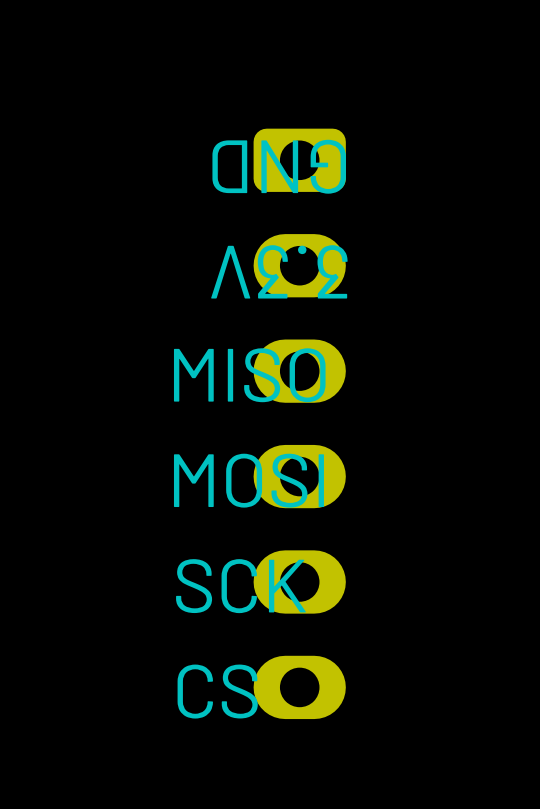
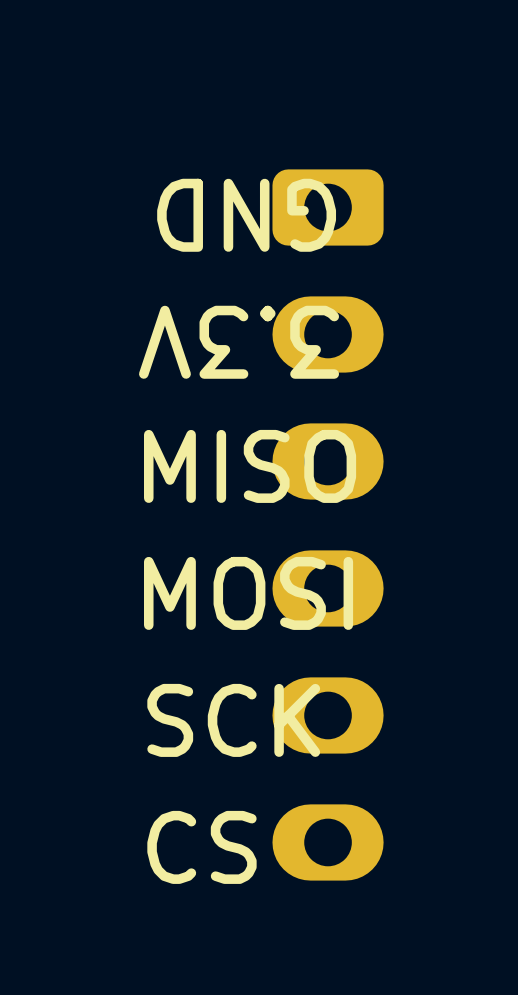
part position: (299, 423) -> (328, 524)

